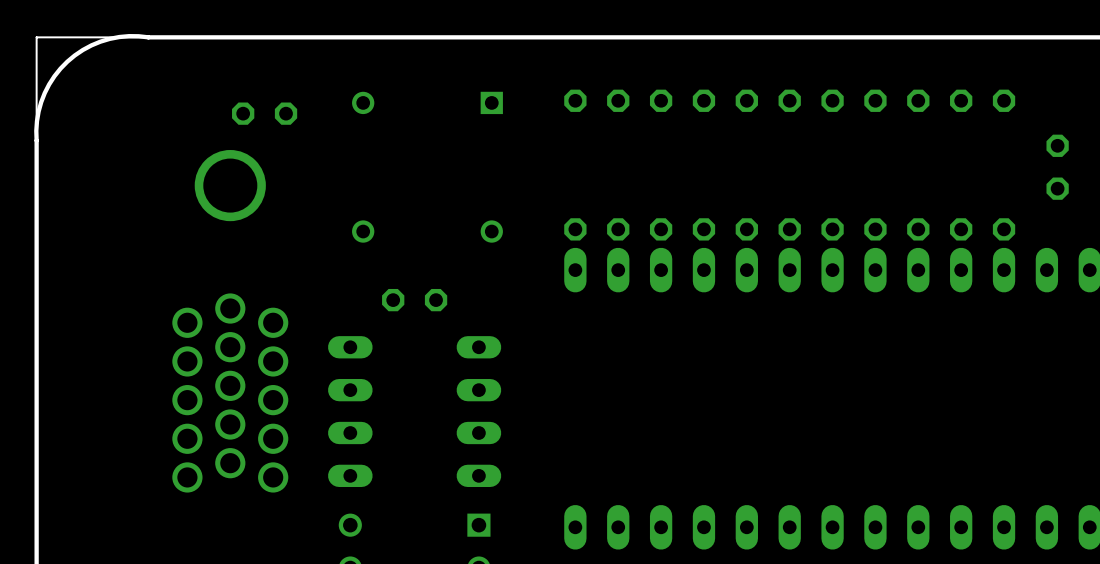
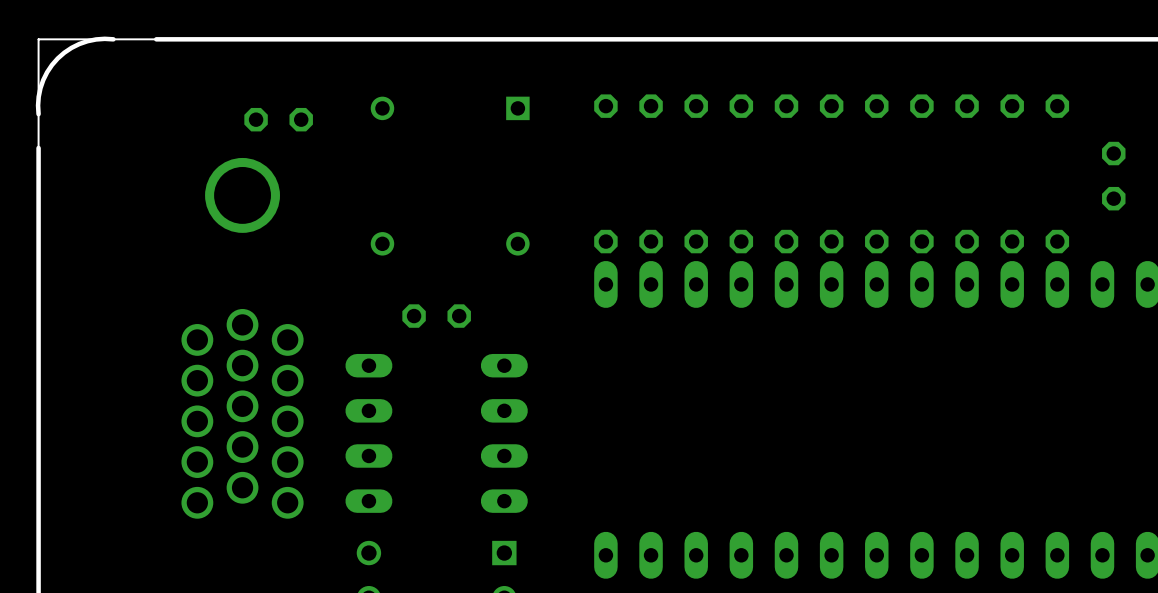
board edge: none -> (113, 39) (96, 39) (79, 44) (57, 58) (43, 80) (38, 96) (38, 114)
board edge: (148, 37) (129, 36) (109, 38) (82, 50) (67, 61) (54, 76) (44, 93) (38, 111) (36, 140) -> none

